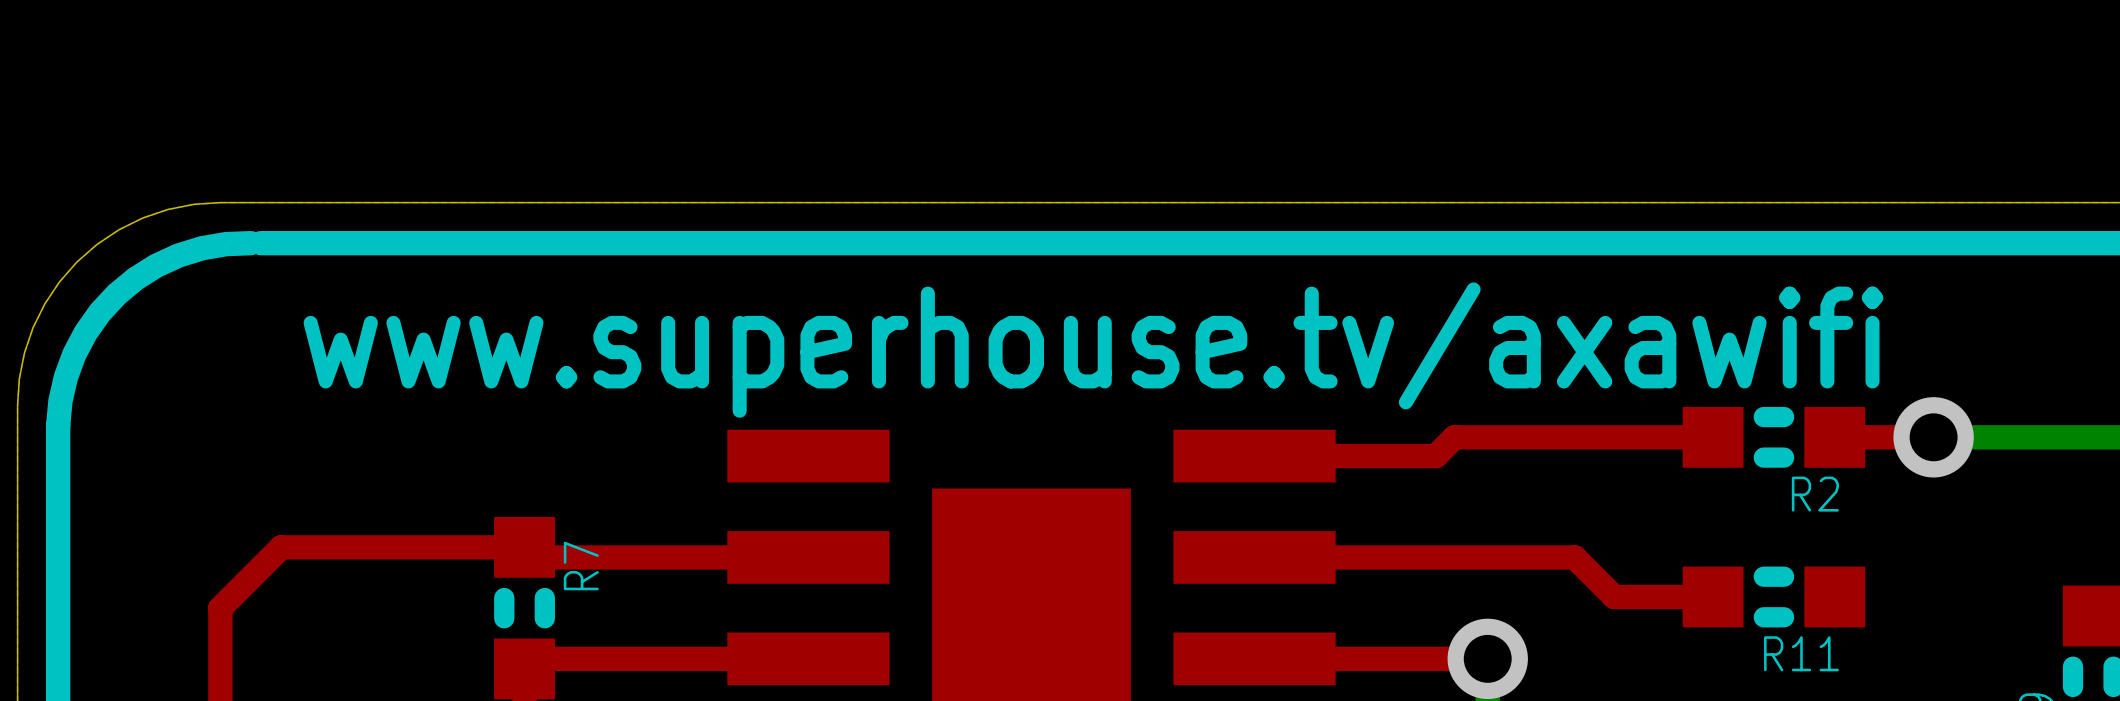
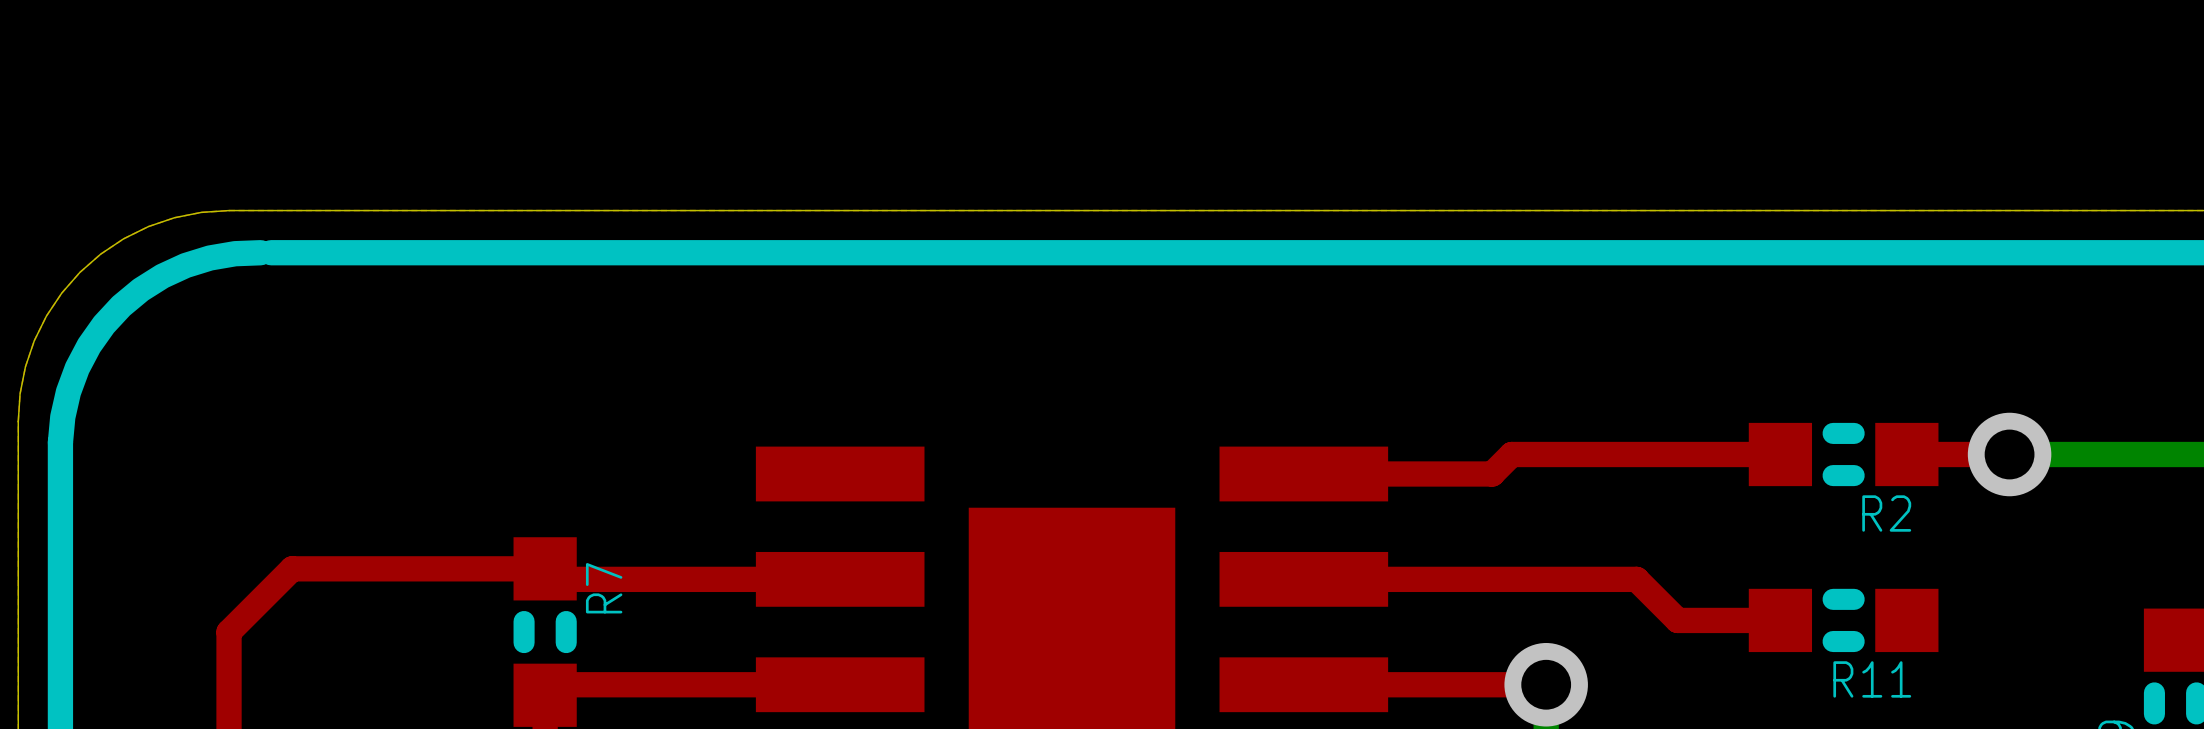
text: www.superhouse.tv/axawifi (1093, 350) -> none

